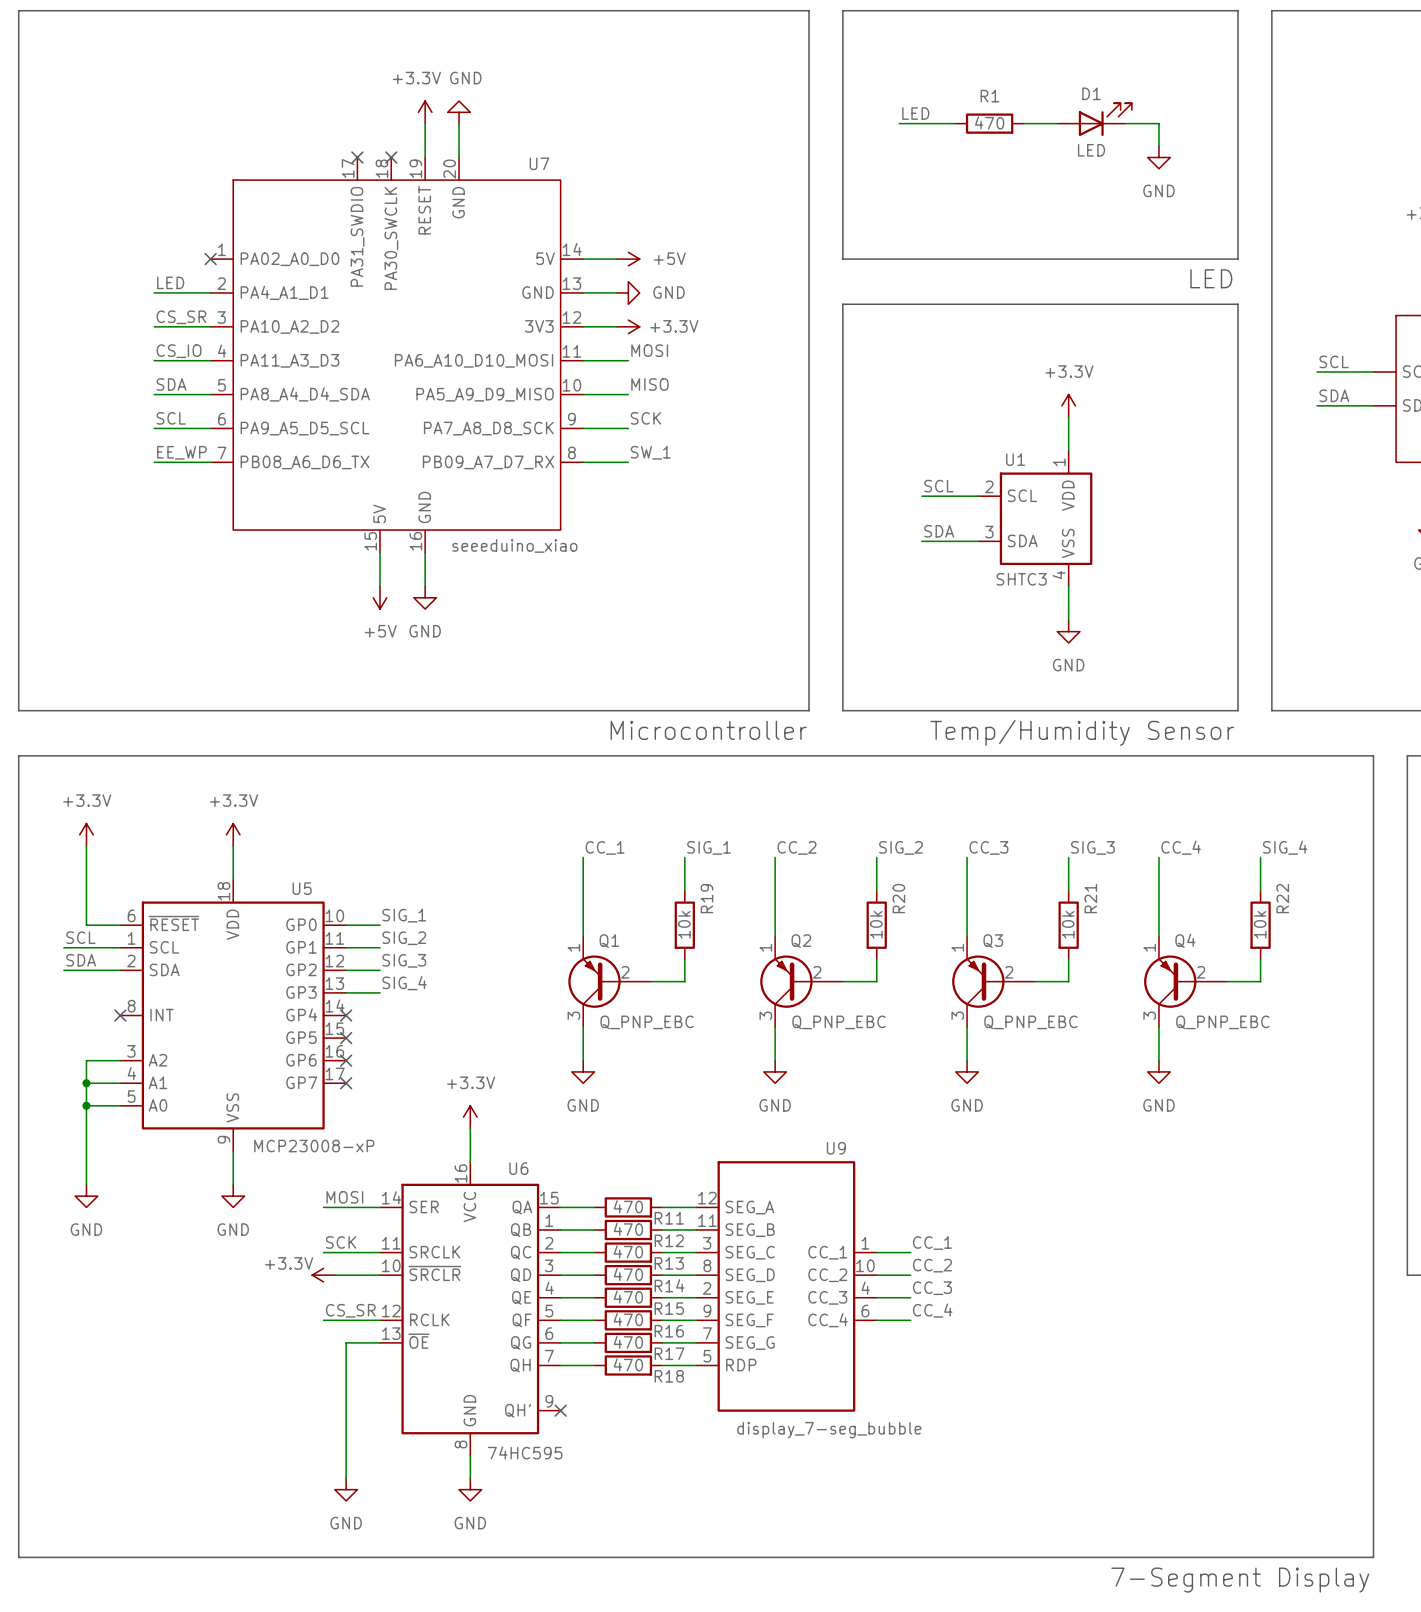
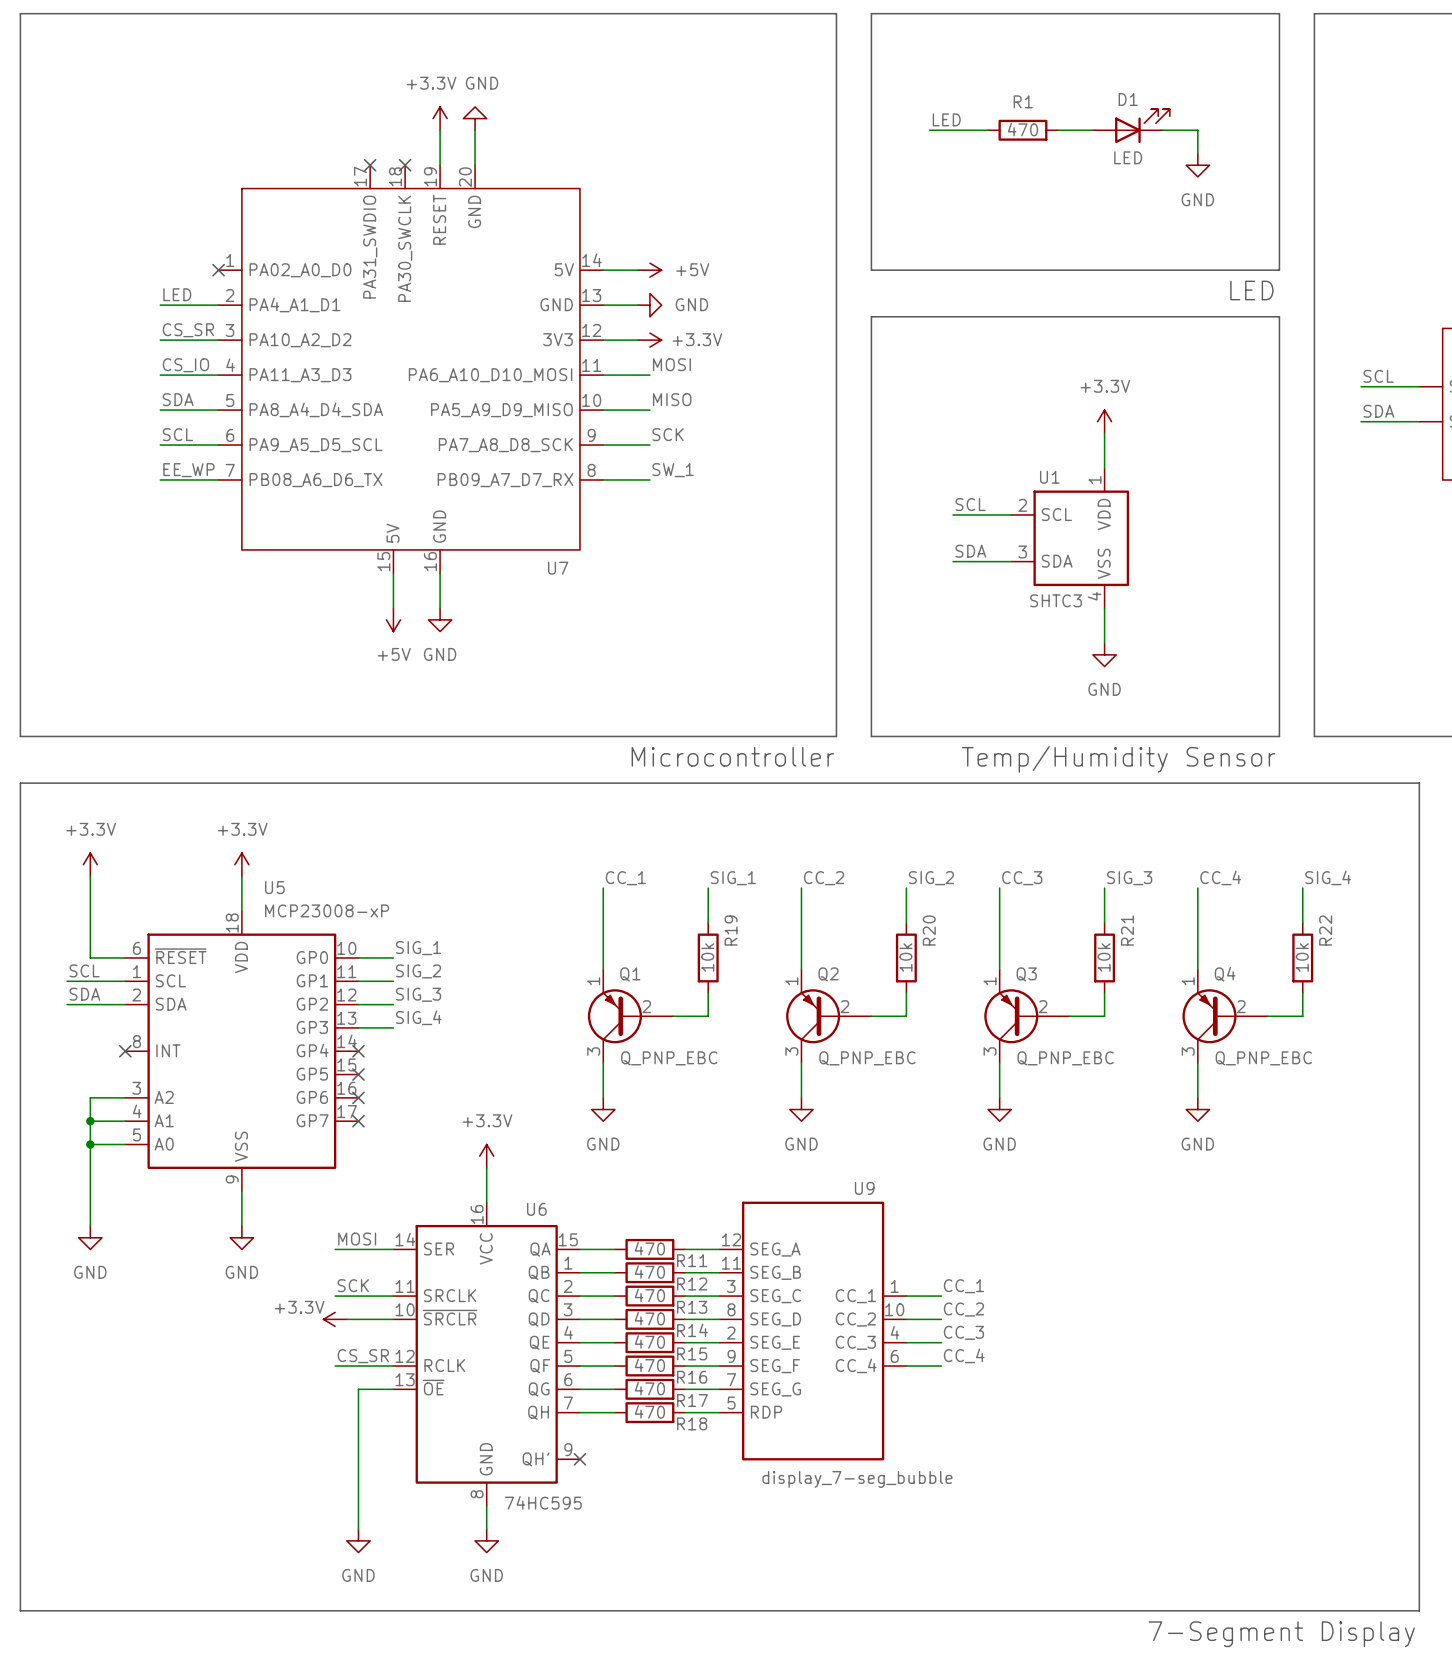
U7 name position: U7 (539, 163) -> U7 (558, 568)
U7 value: seeeduino_xiao (514, 545) -> none
U5 name position: U5 (302, 888) -> U5 (274, 887)
U5 value position: MCP23008-xP (314, 1146) -> MCP23008-xP (327, 910)

